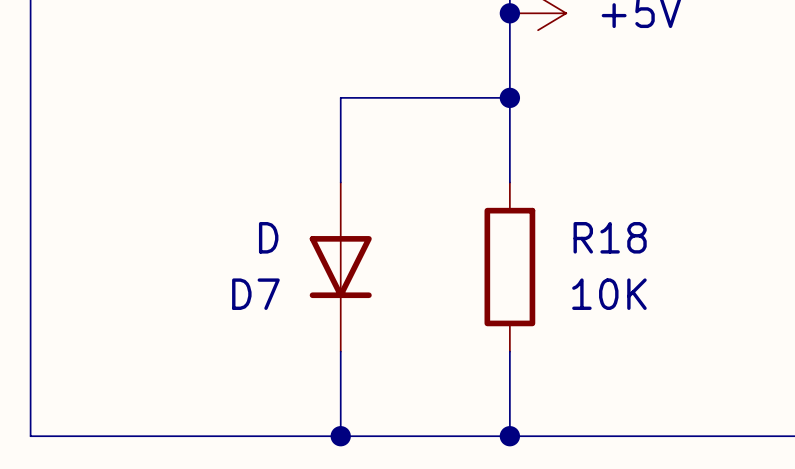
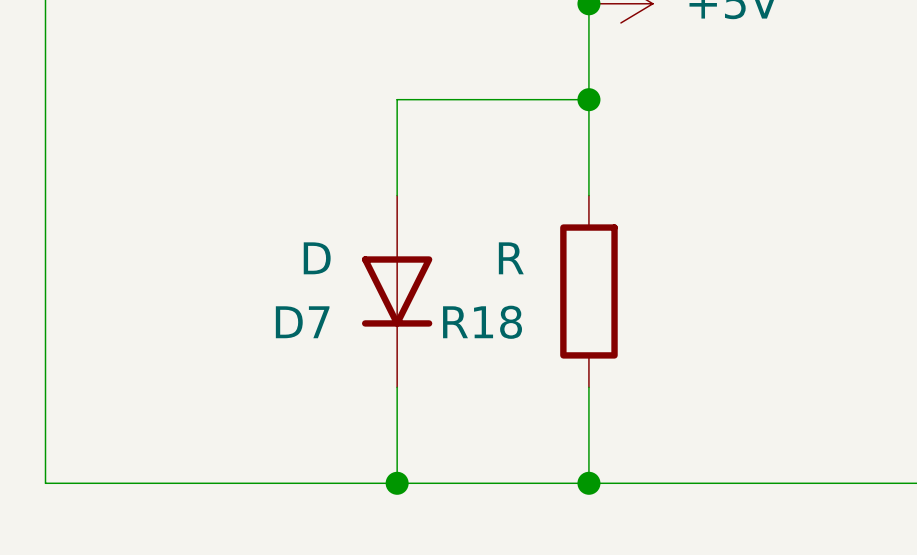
R18 name position: R18 (610, 237) -> R18 (482, 322)
R18 value: 10K (609, 294) -> R (511, 258)

